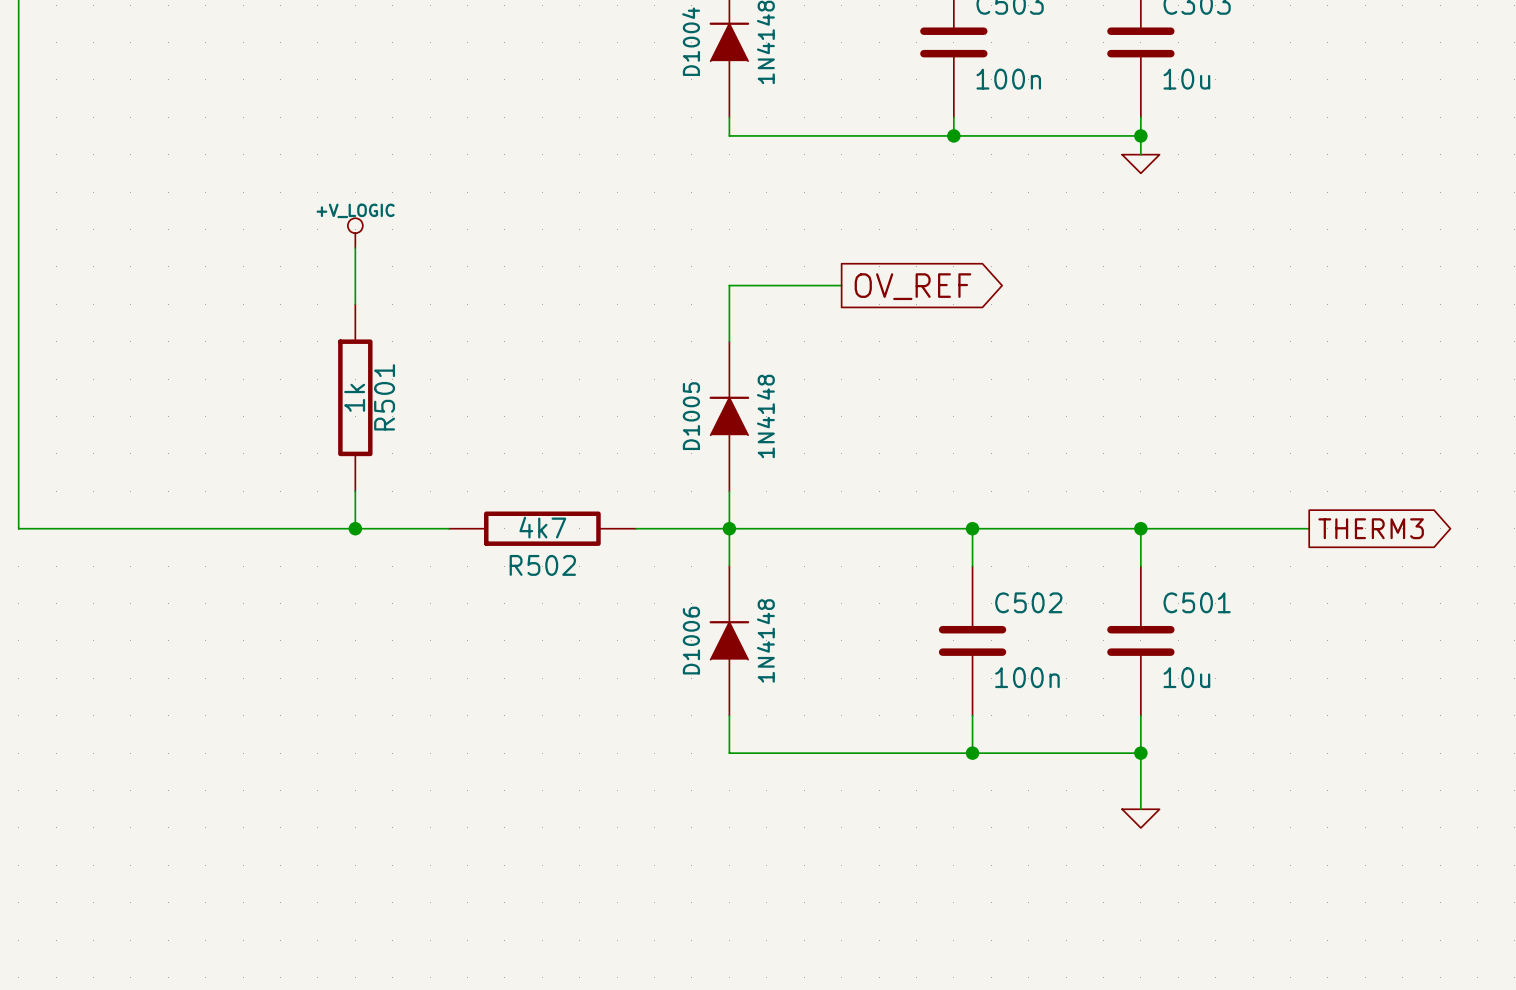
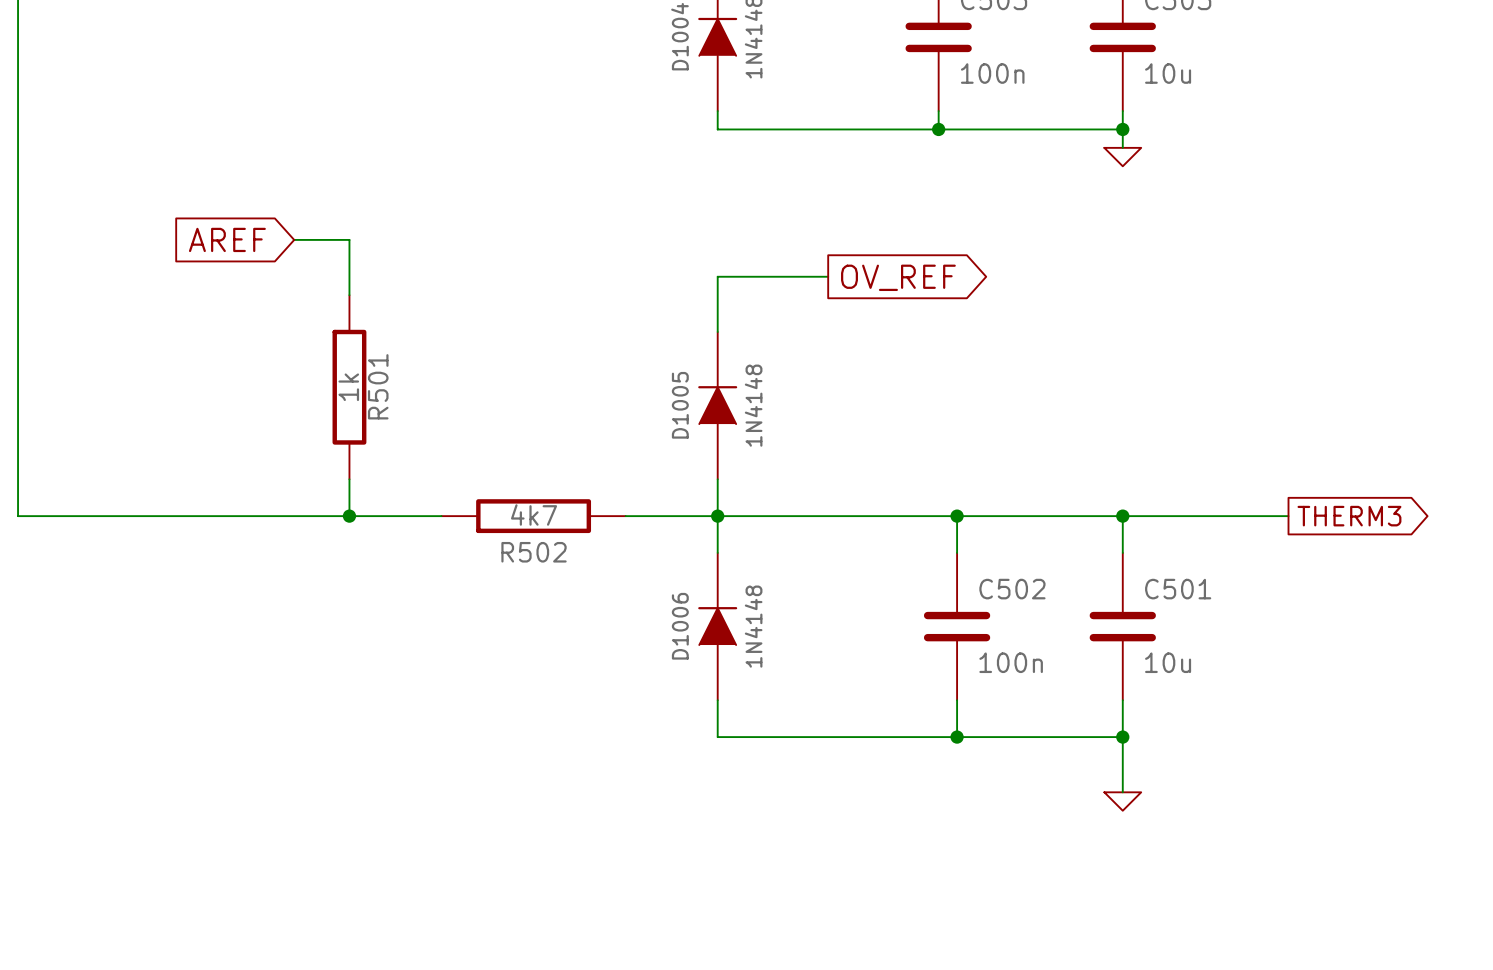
power symbol: +V_LOGIC (355, 233) -> none
global label: none -> AREF (227, 239)
wire: none -> (294, 239) (349, 239)

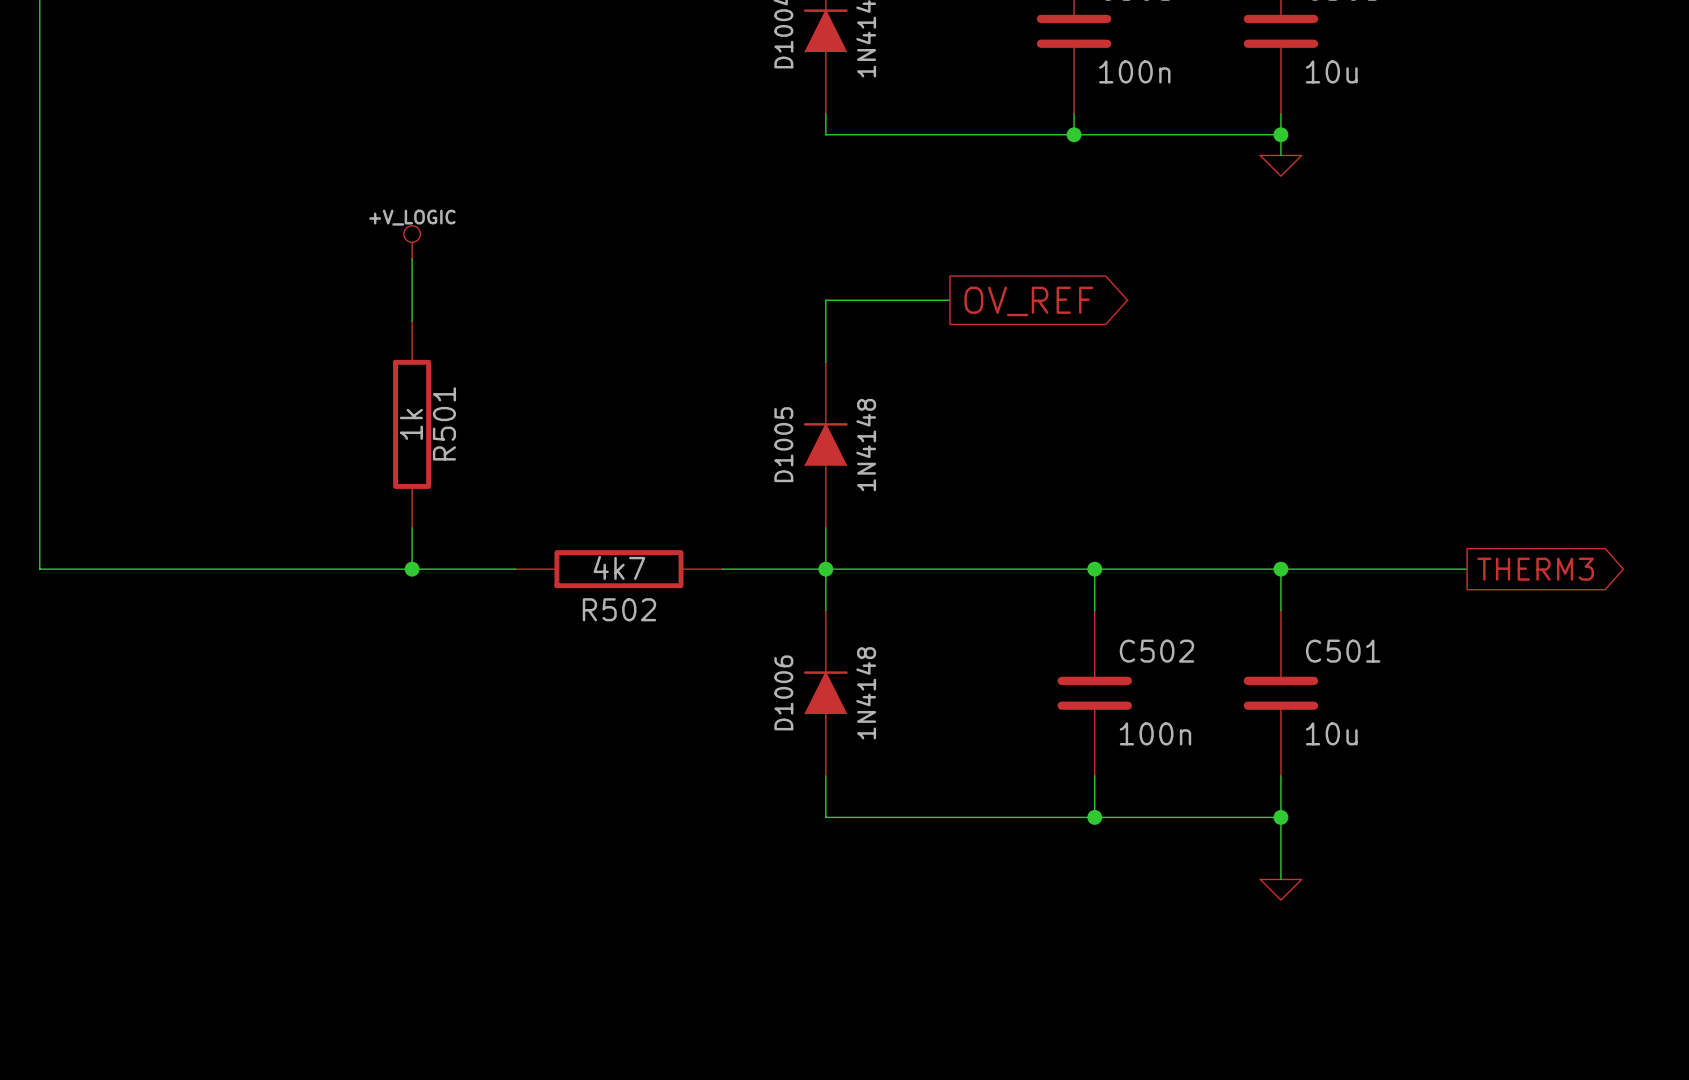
power symbol: none -> +V_LOGIC (412, 242)
global label: AREF (227, 239) -> none
wire: (294, 239) (349, 239) -> none

